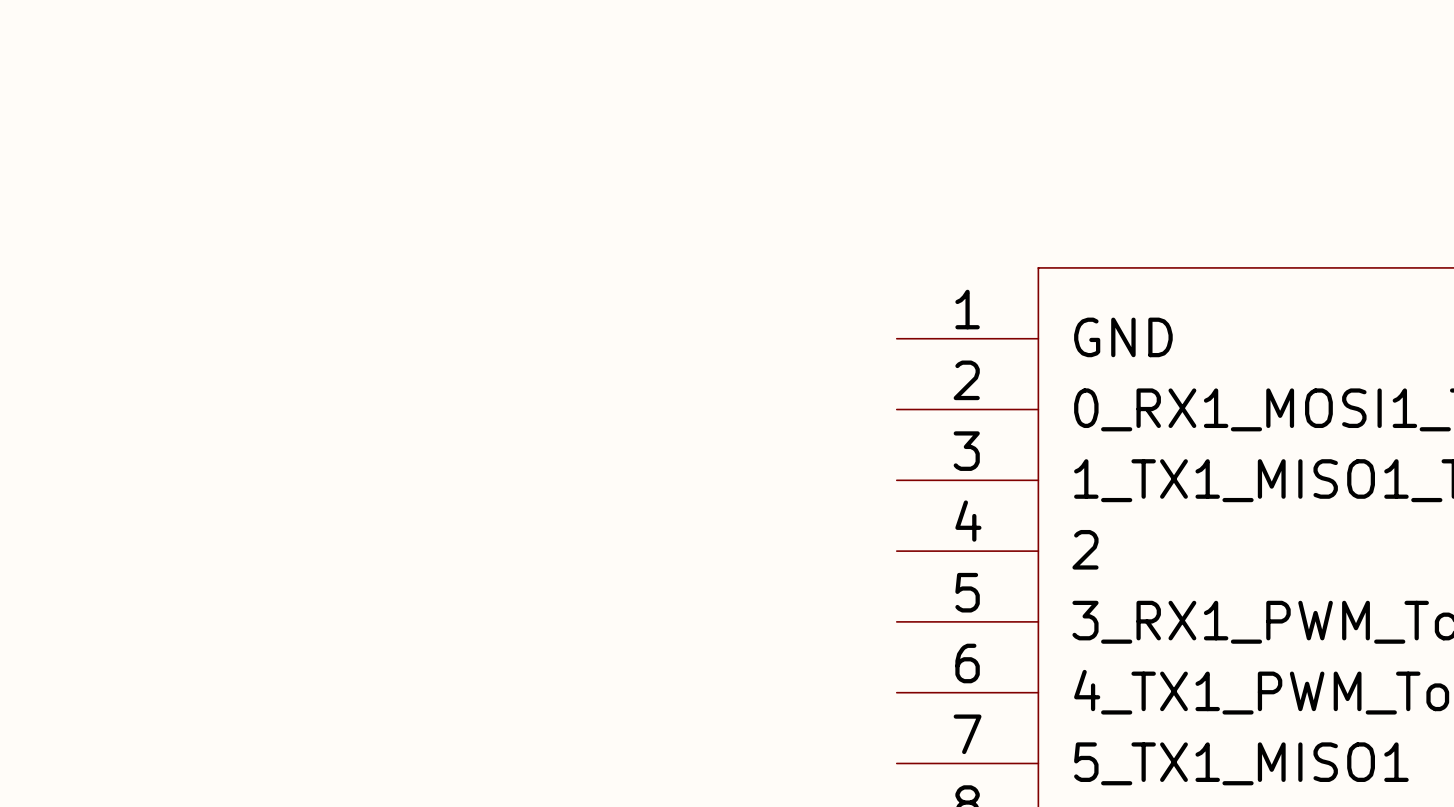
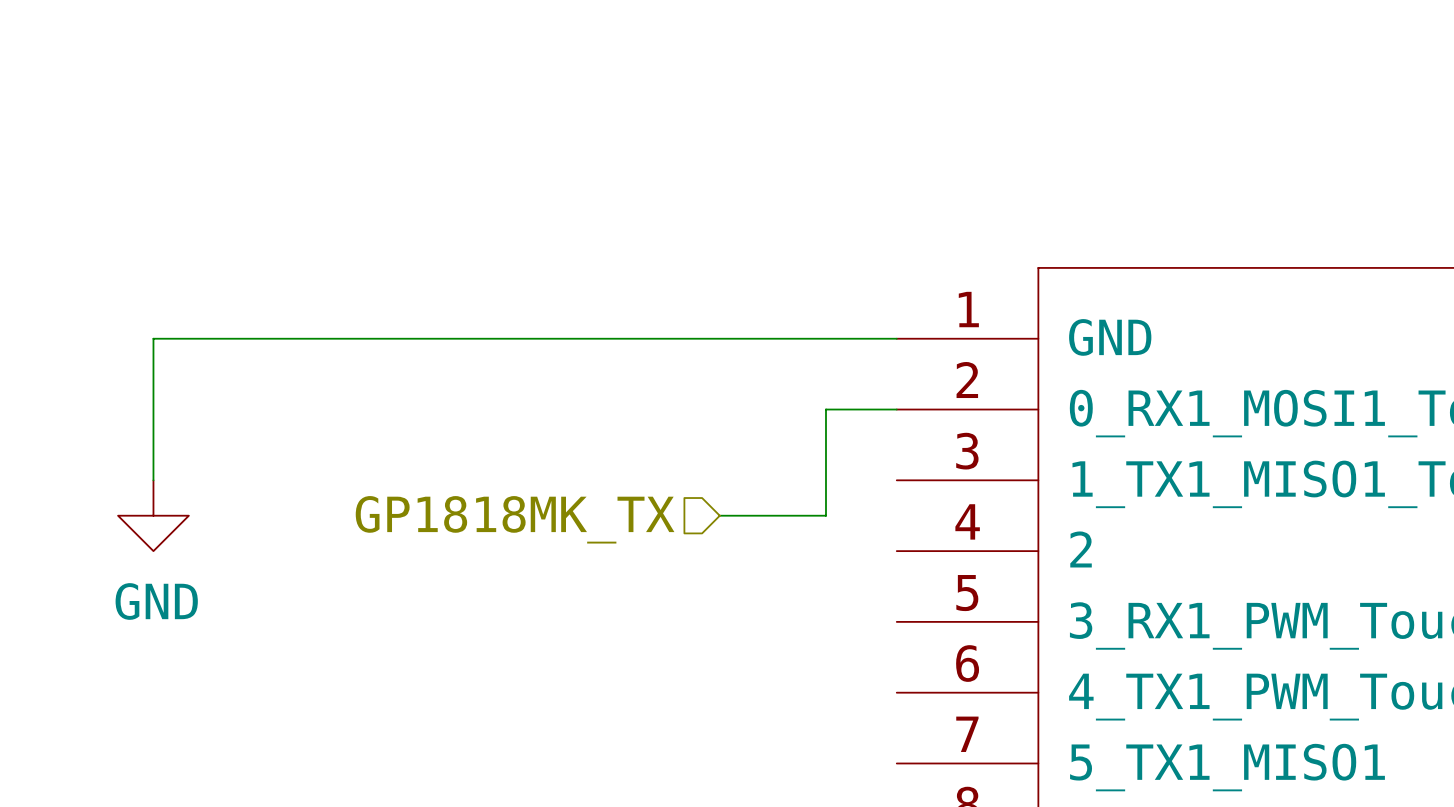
wire: none -> (896, 338) (153, 338) (153, 480)
wire: none -> (896, 409) (825, 409) (825, 515) (719, 515)
power symbol: none -> GND (153, 515)
hierarchical label: none -> GP1818MK_TX (515, 519)

